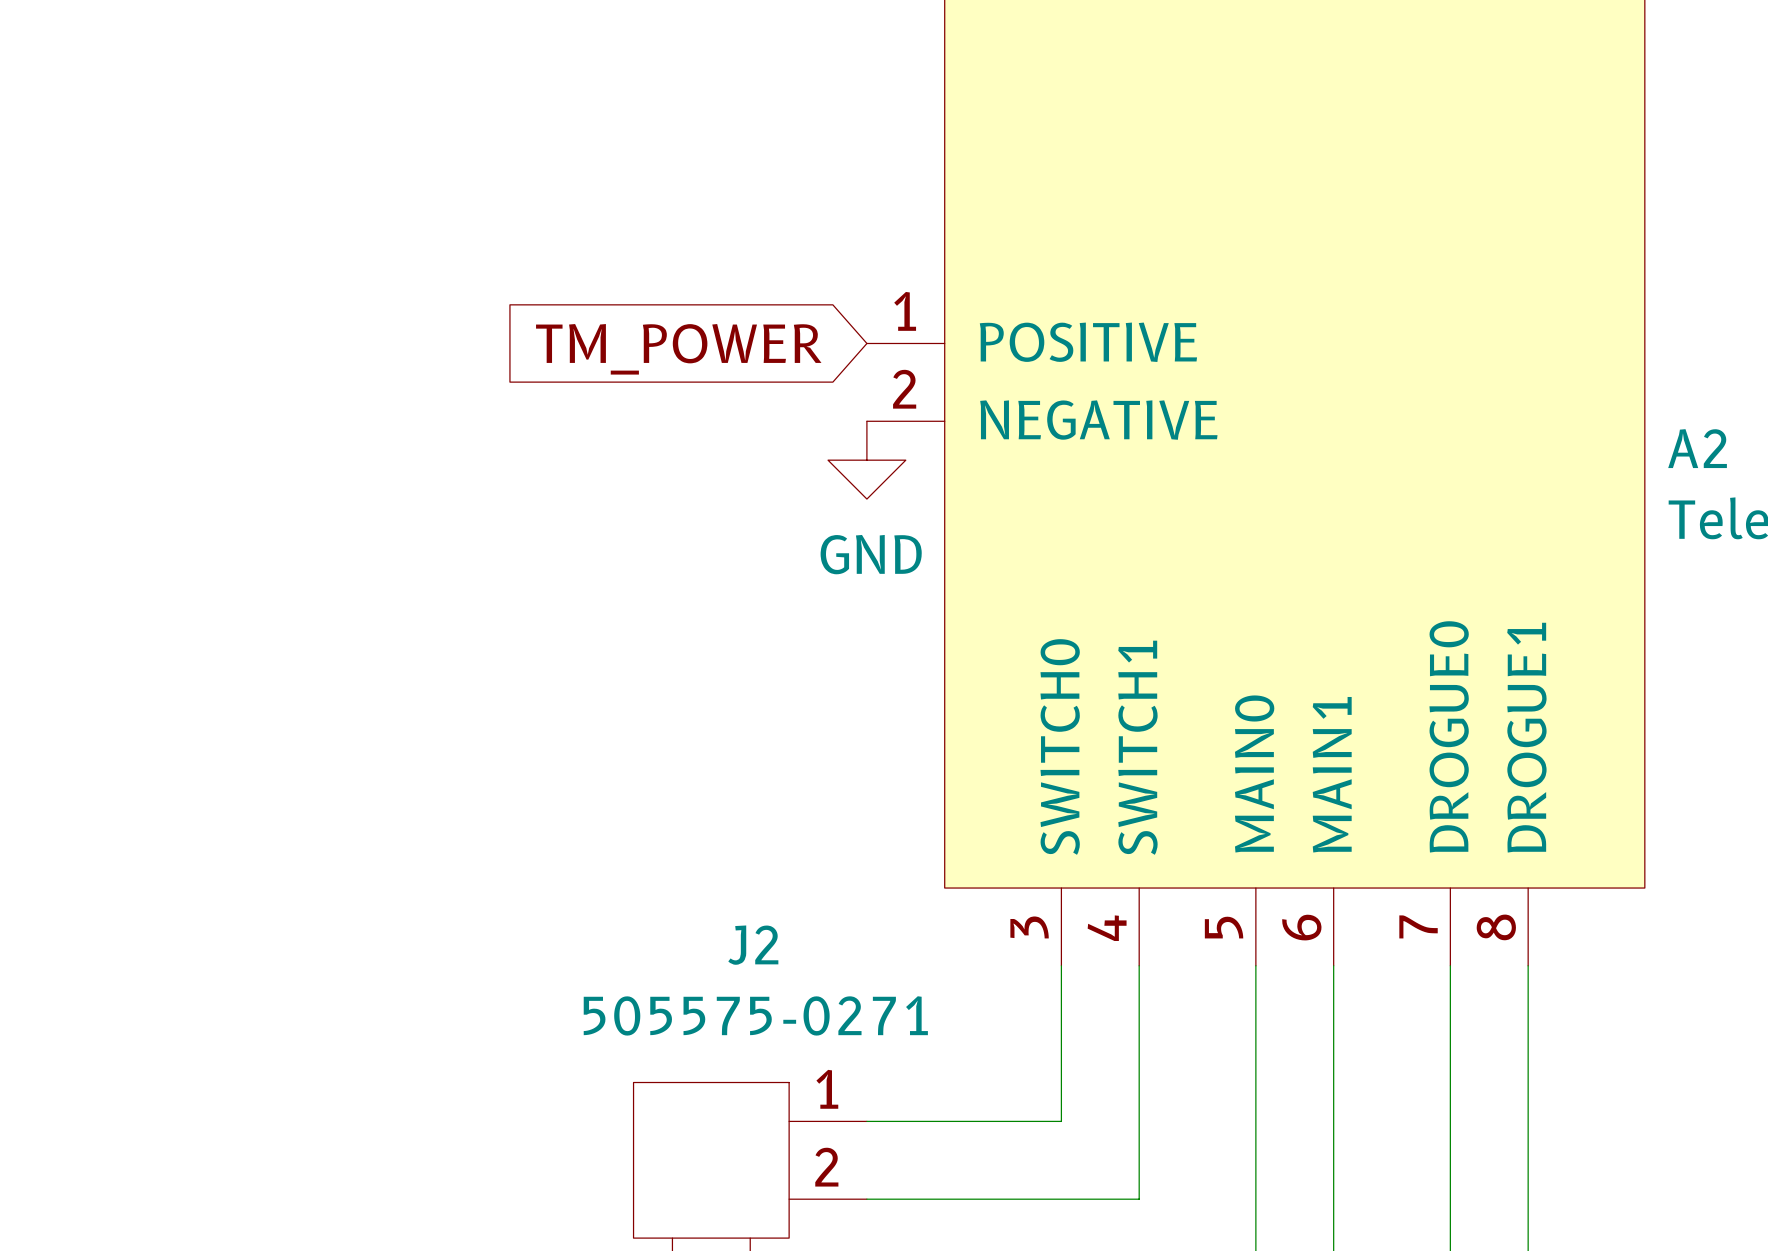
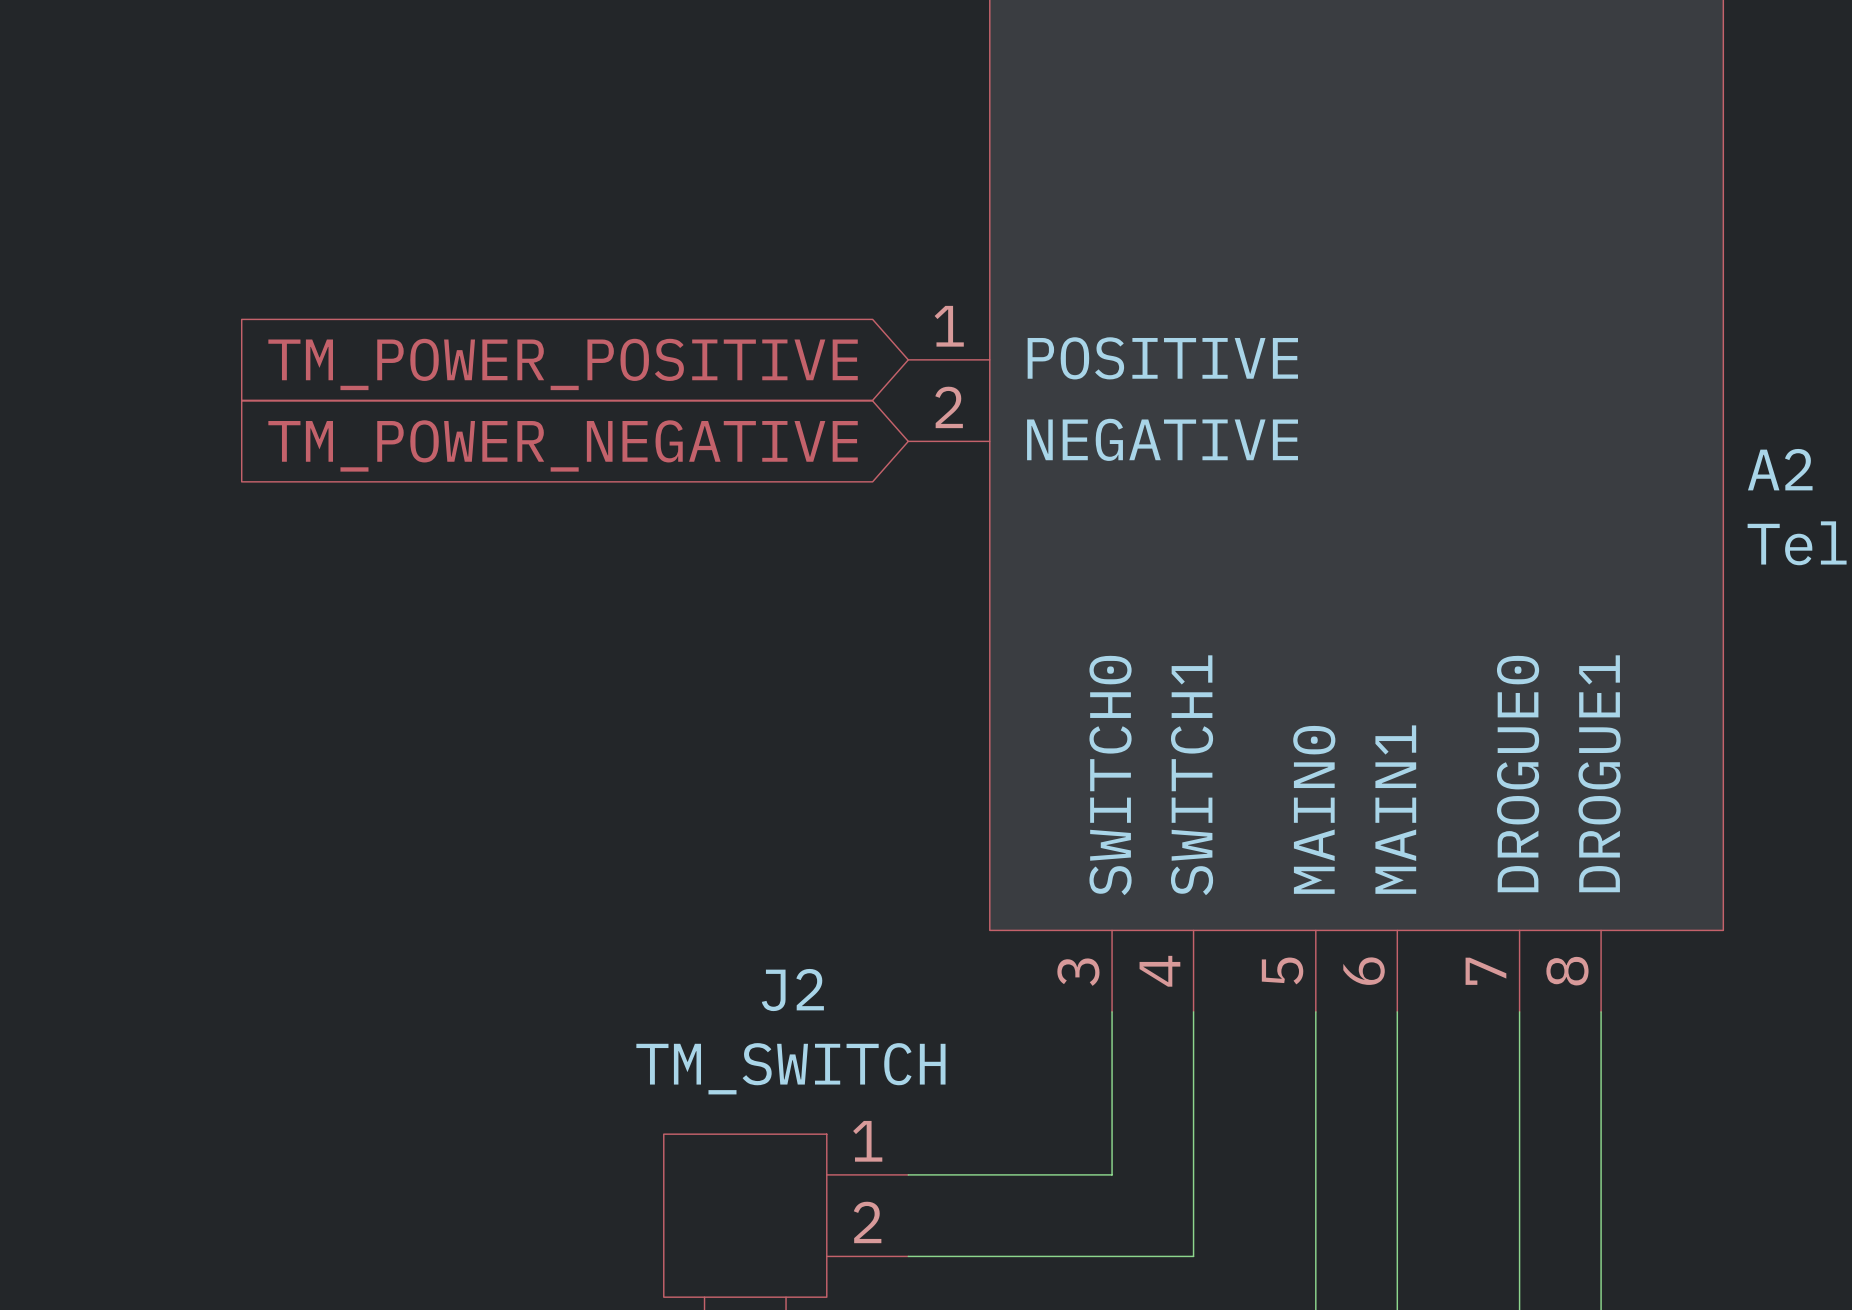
global label: TM_POWER (678, 349) -> TM_POWER_POSITIVE (563, 364)
global label: none -> TM_POWER_NEGATIVE (563, 445)
power symbol: GND (866, 460) -> none
J2 value: 505575-0271 (755, 1015) -> TM_SWITCH (790, 1068)

